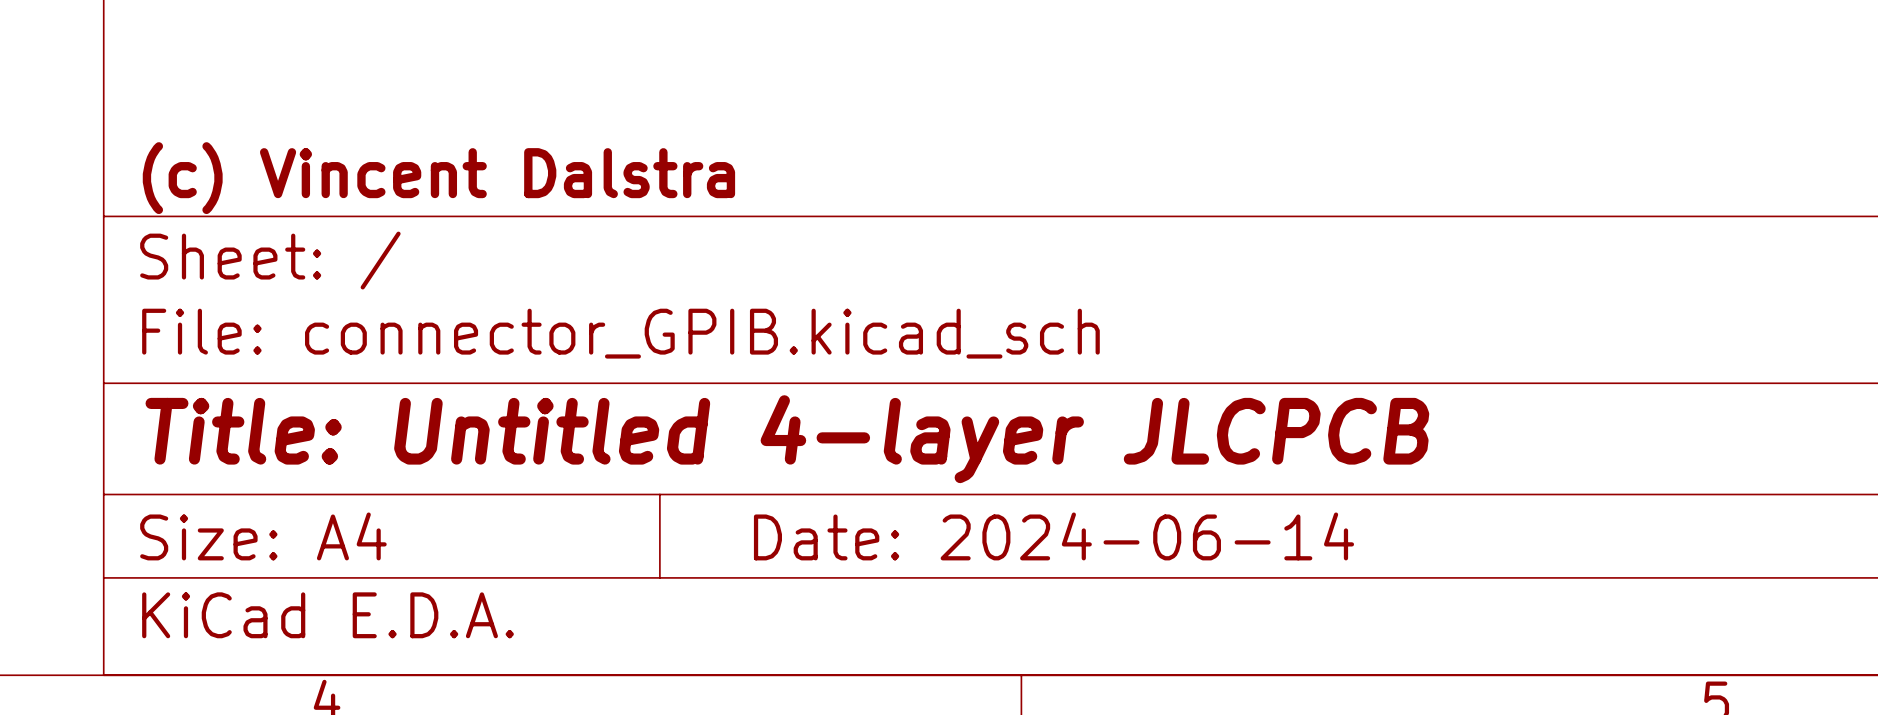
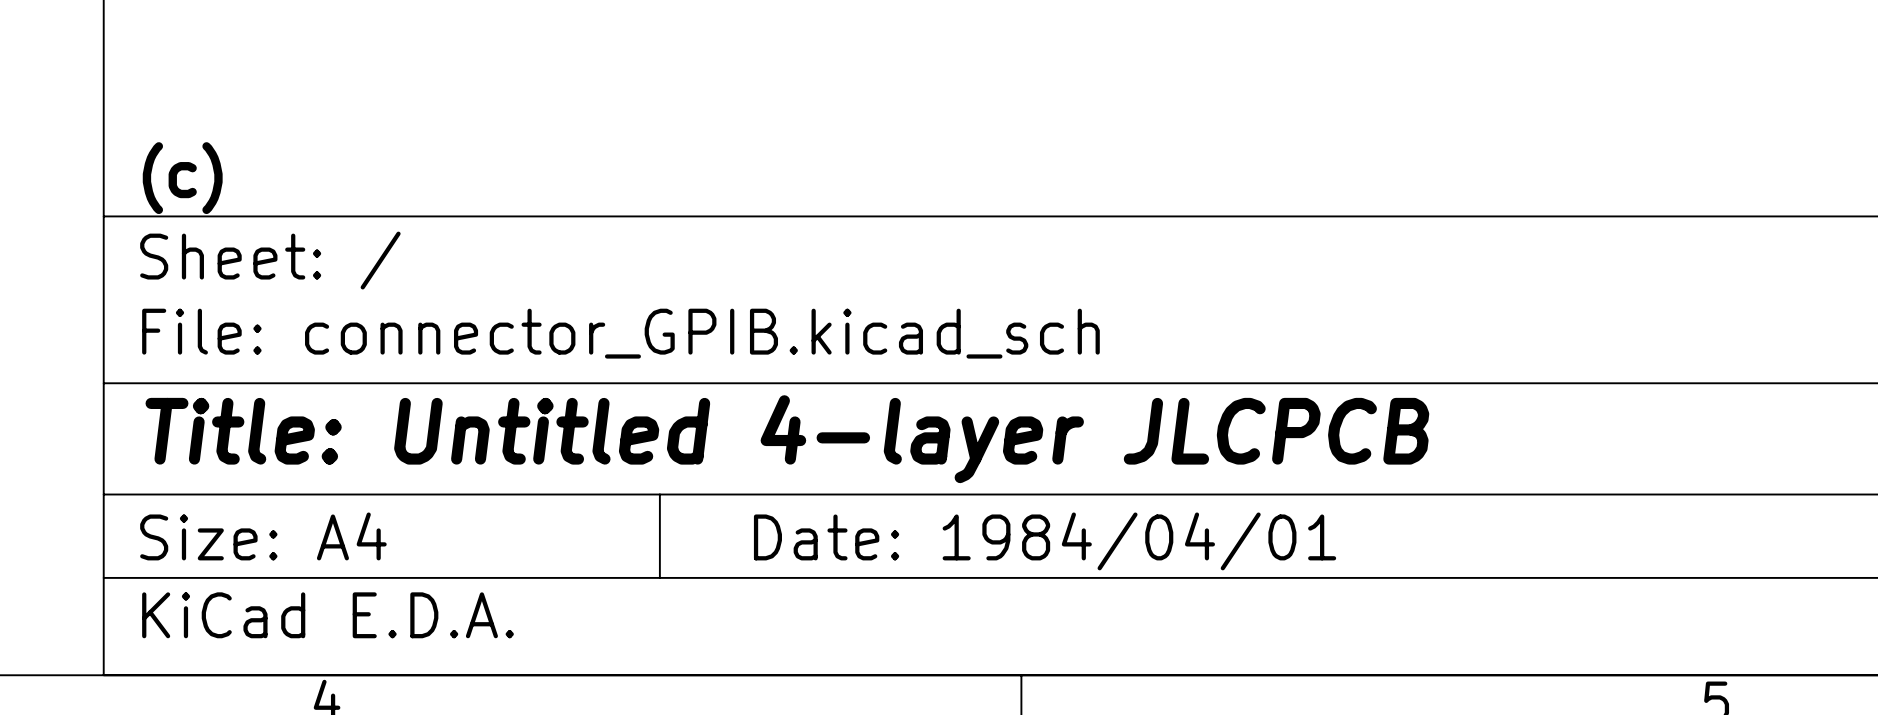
title block: (c) Vincent Dalstra (438, 178) -> (c) (182, 178)
title block: Date: 2024-06-14 (1053, 536) -> Date: 1984/04/01 (1045, 541)

